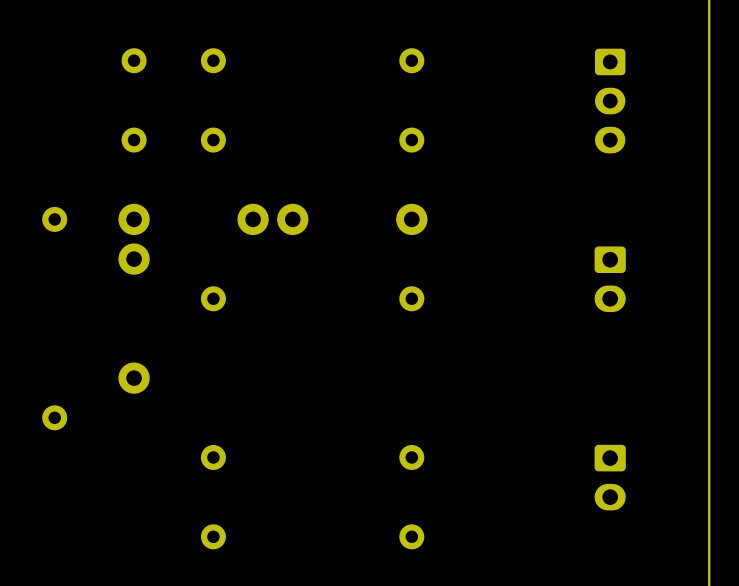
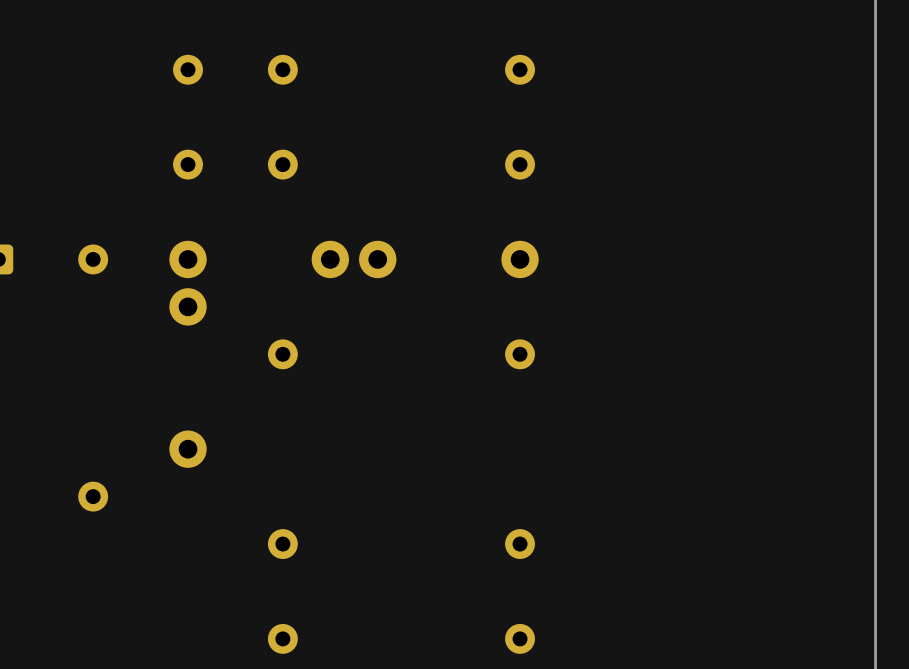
part: (610, 101) -> none
part: (610, 279) -> none
part: (610, 477) -> none

